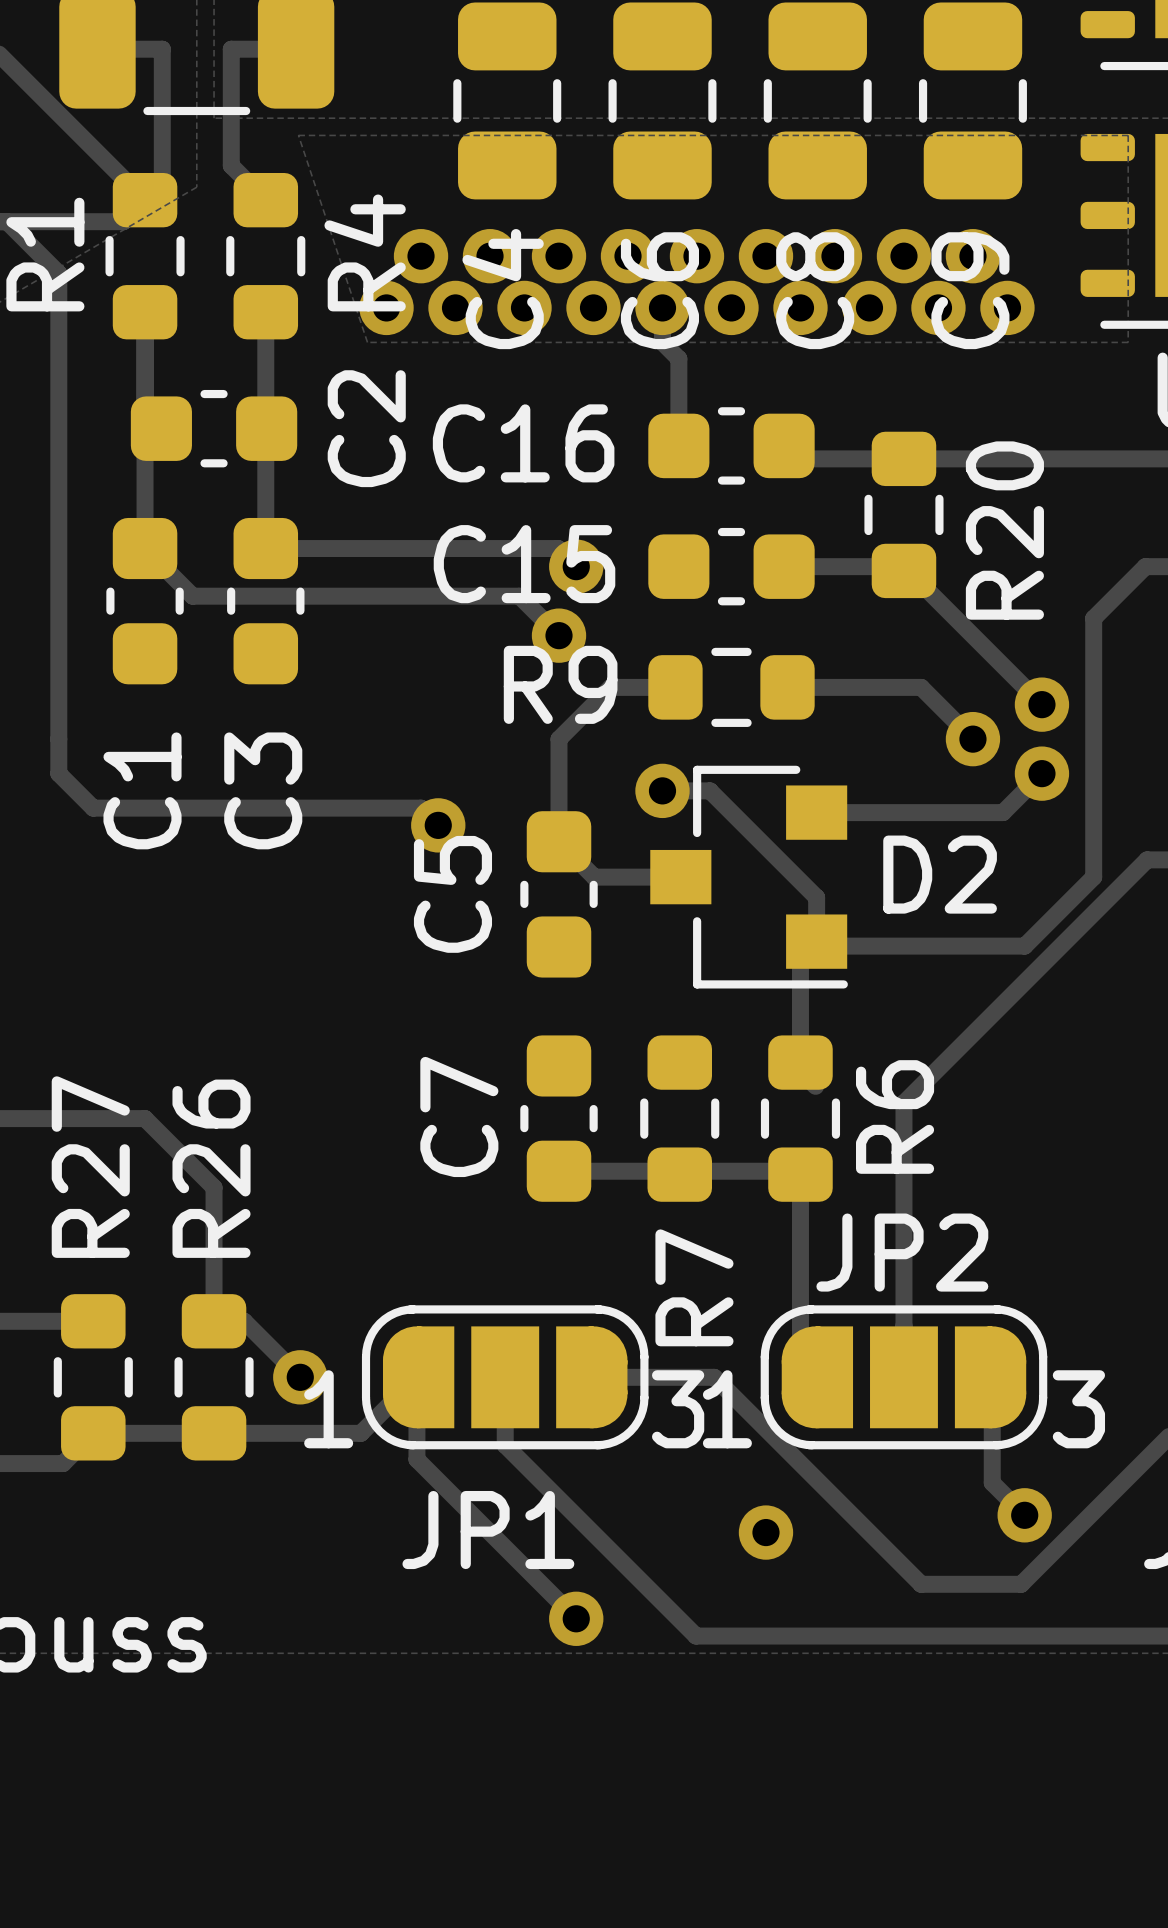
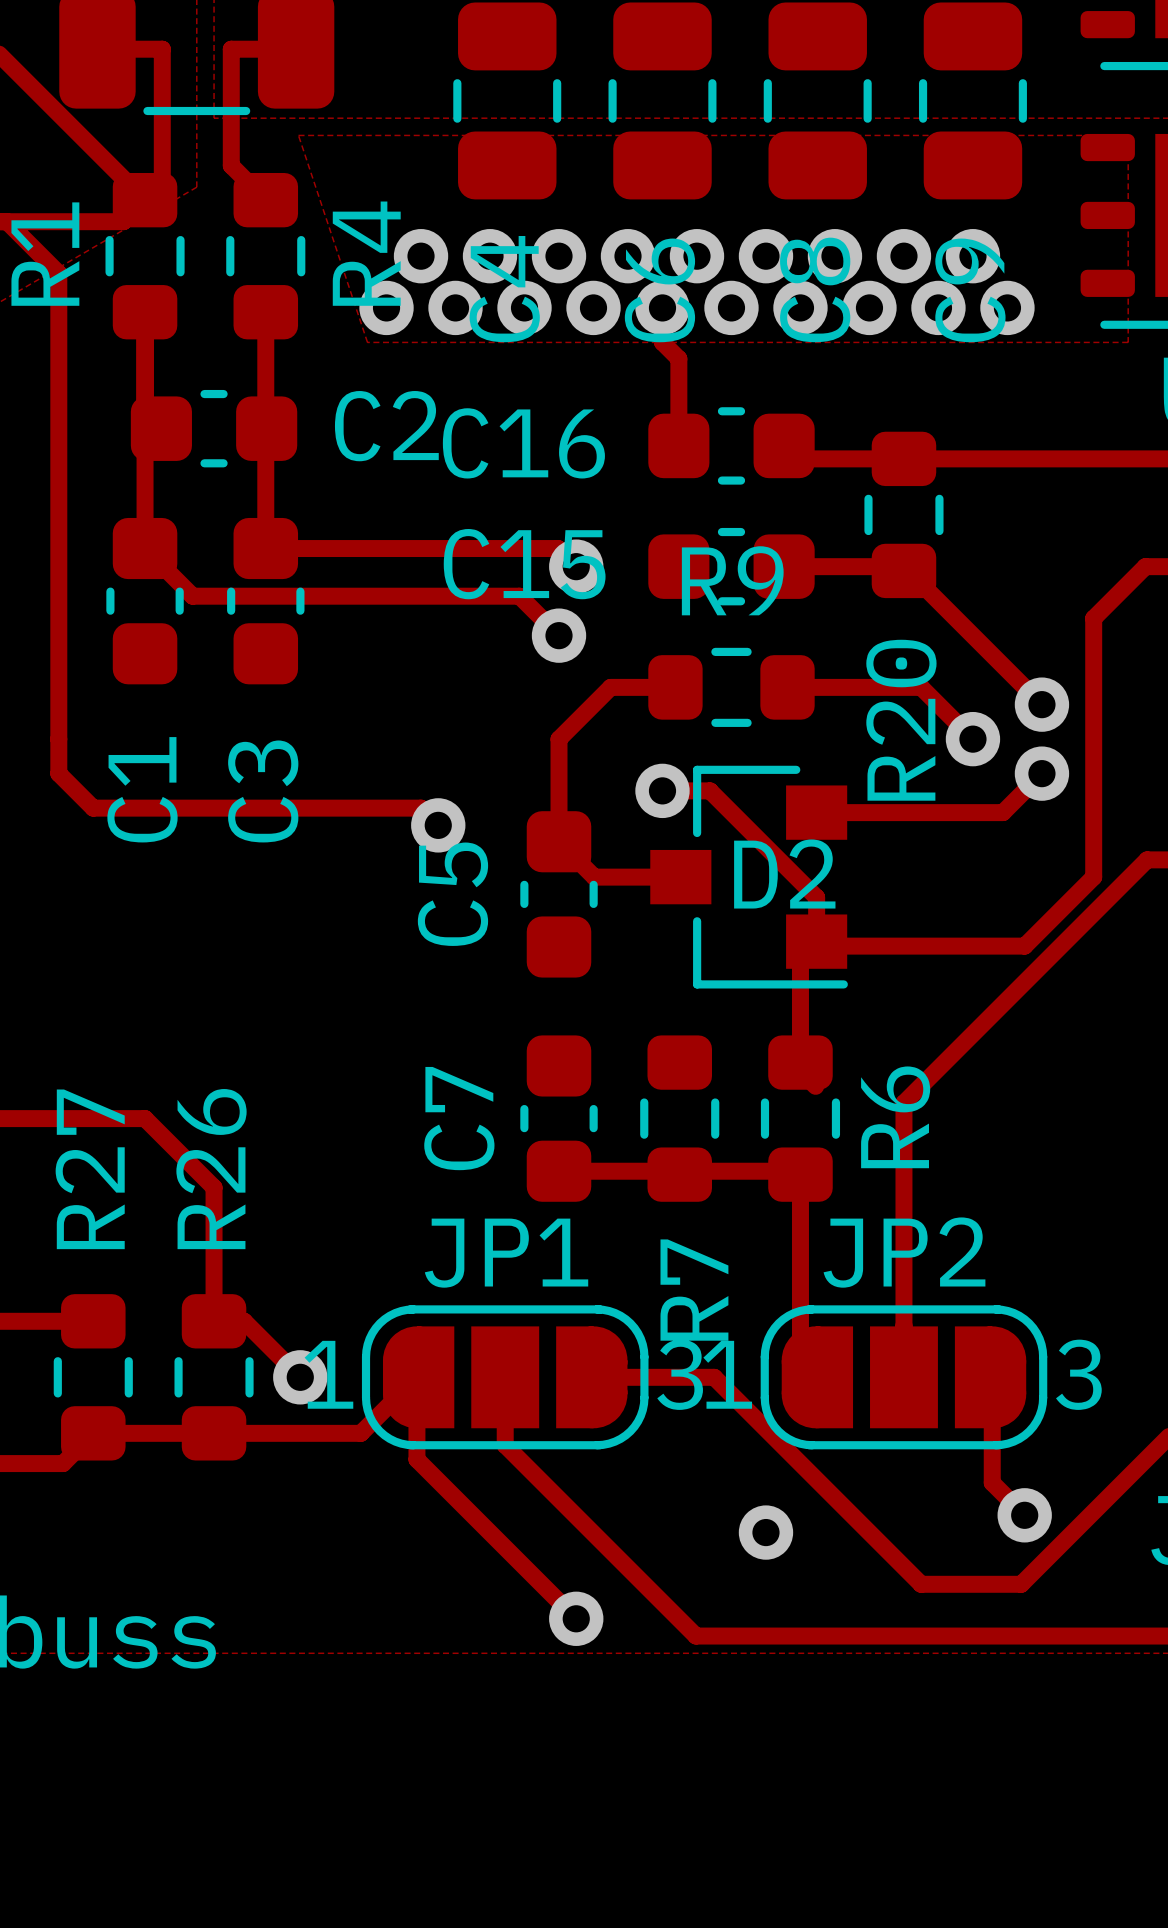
C2 name rotation: 0° (366, 428) -> 90° clockwise (386, 426)
R20 name position: R20 (1004, 530) -> R20 (901, 720)
R9 name position: R9 (560, 684) -> R9 (732, 580)
D2 name position: D2 (940, 874) -> D2 (784, 874)
JP1 text position: 1 (328, 1409) -> 1 (328, 1374)
JP1 text position: 3 (678, 1409) -> 3 (680, 1374)
JP2 text position: 1 (727, 1409) -> 1 (727, 1374)
JP2 text position: 3 (1078, 1409) -> 3 (1078, 1374)
JP1 name position: JP1 (488, 1530) -> JP1 (506, 1253)

